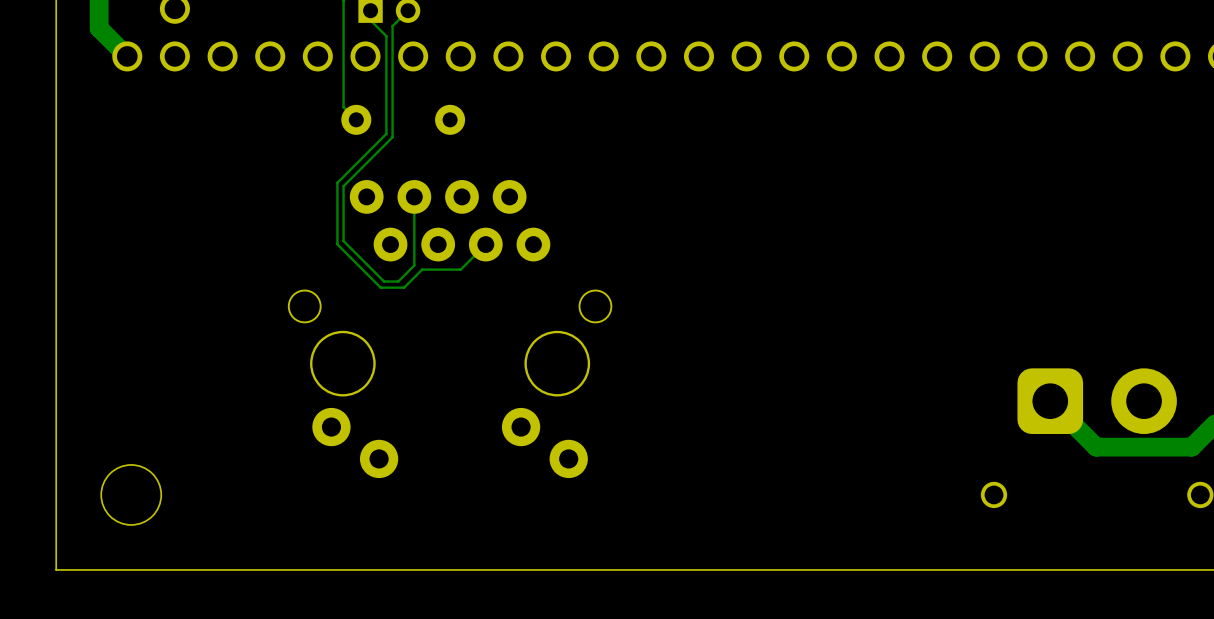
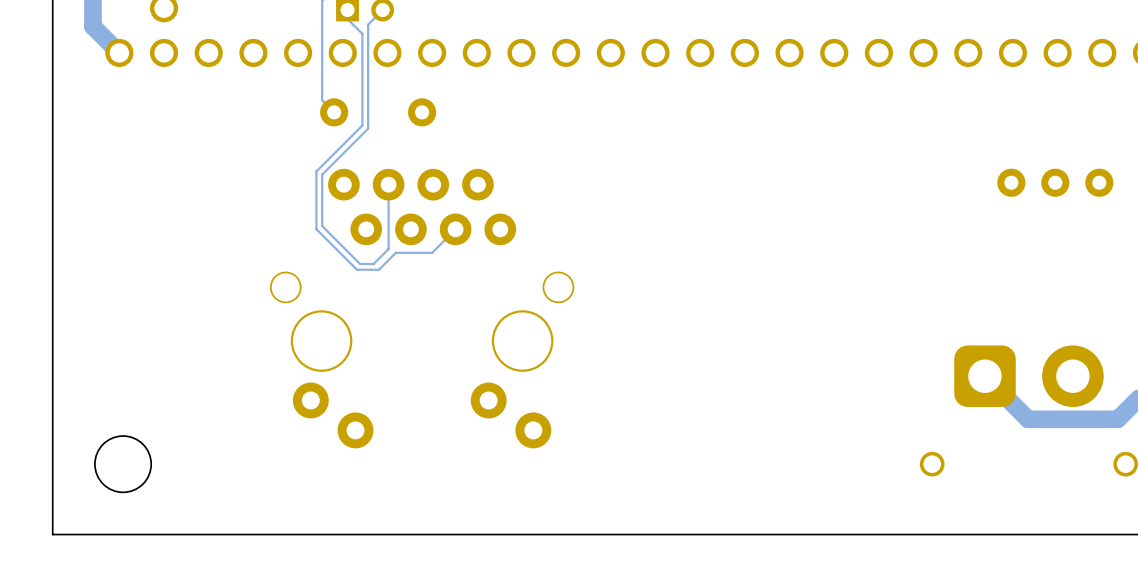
part: none -> (1055, 182)

